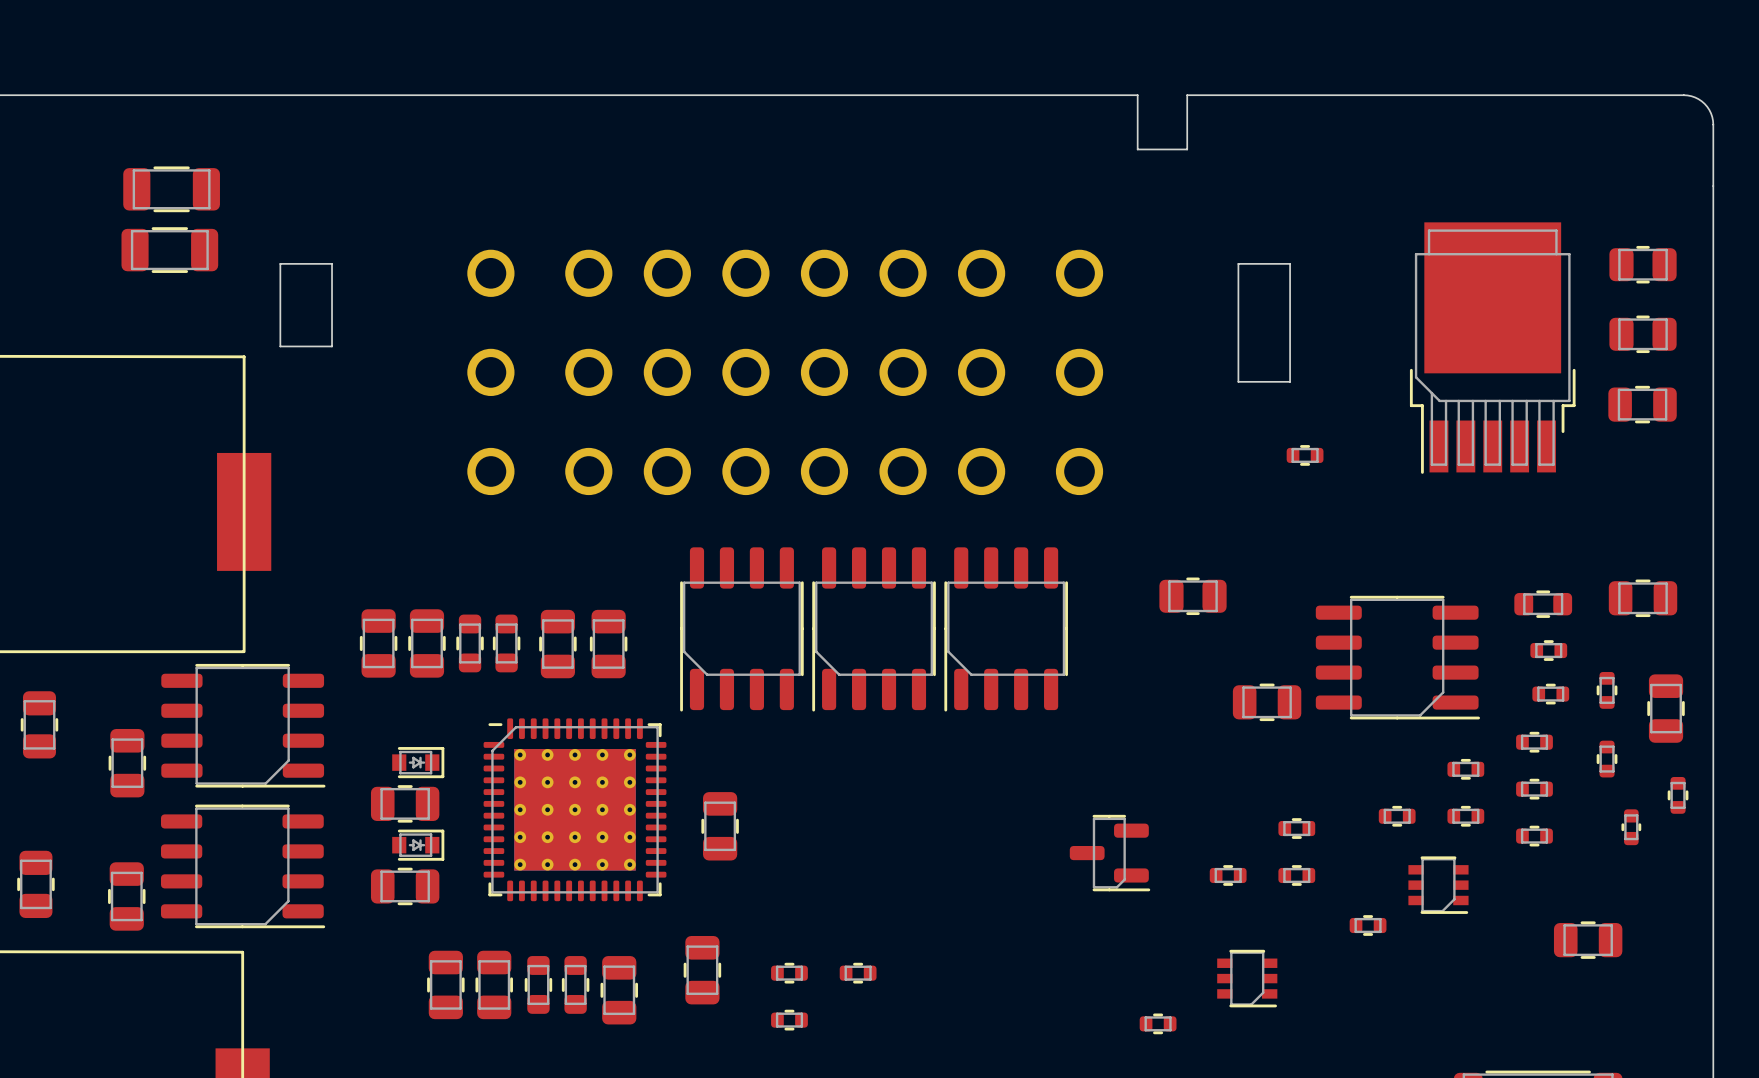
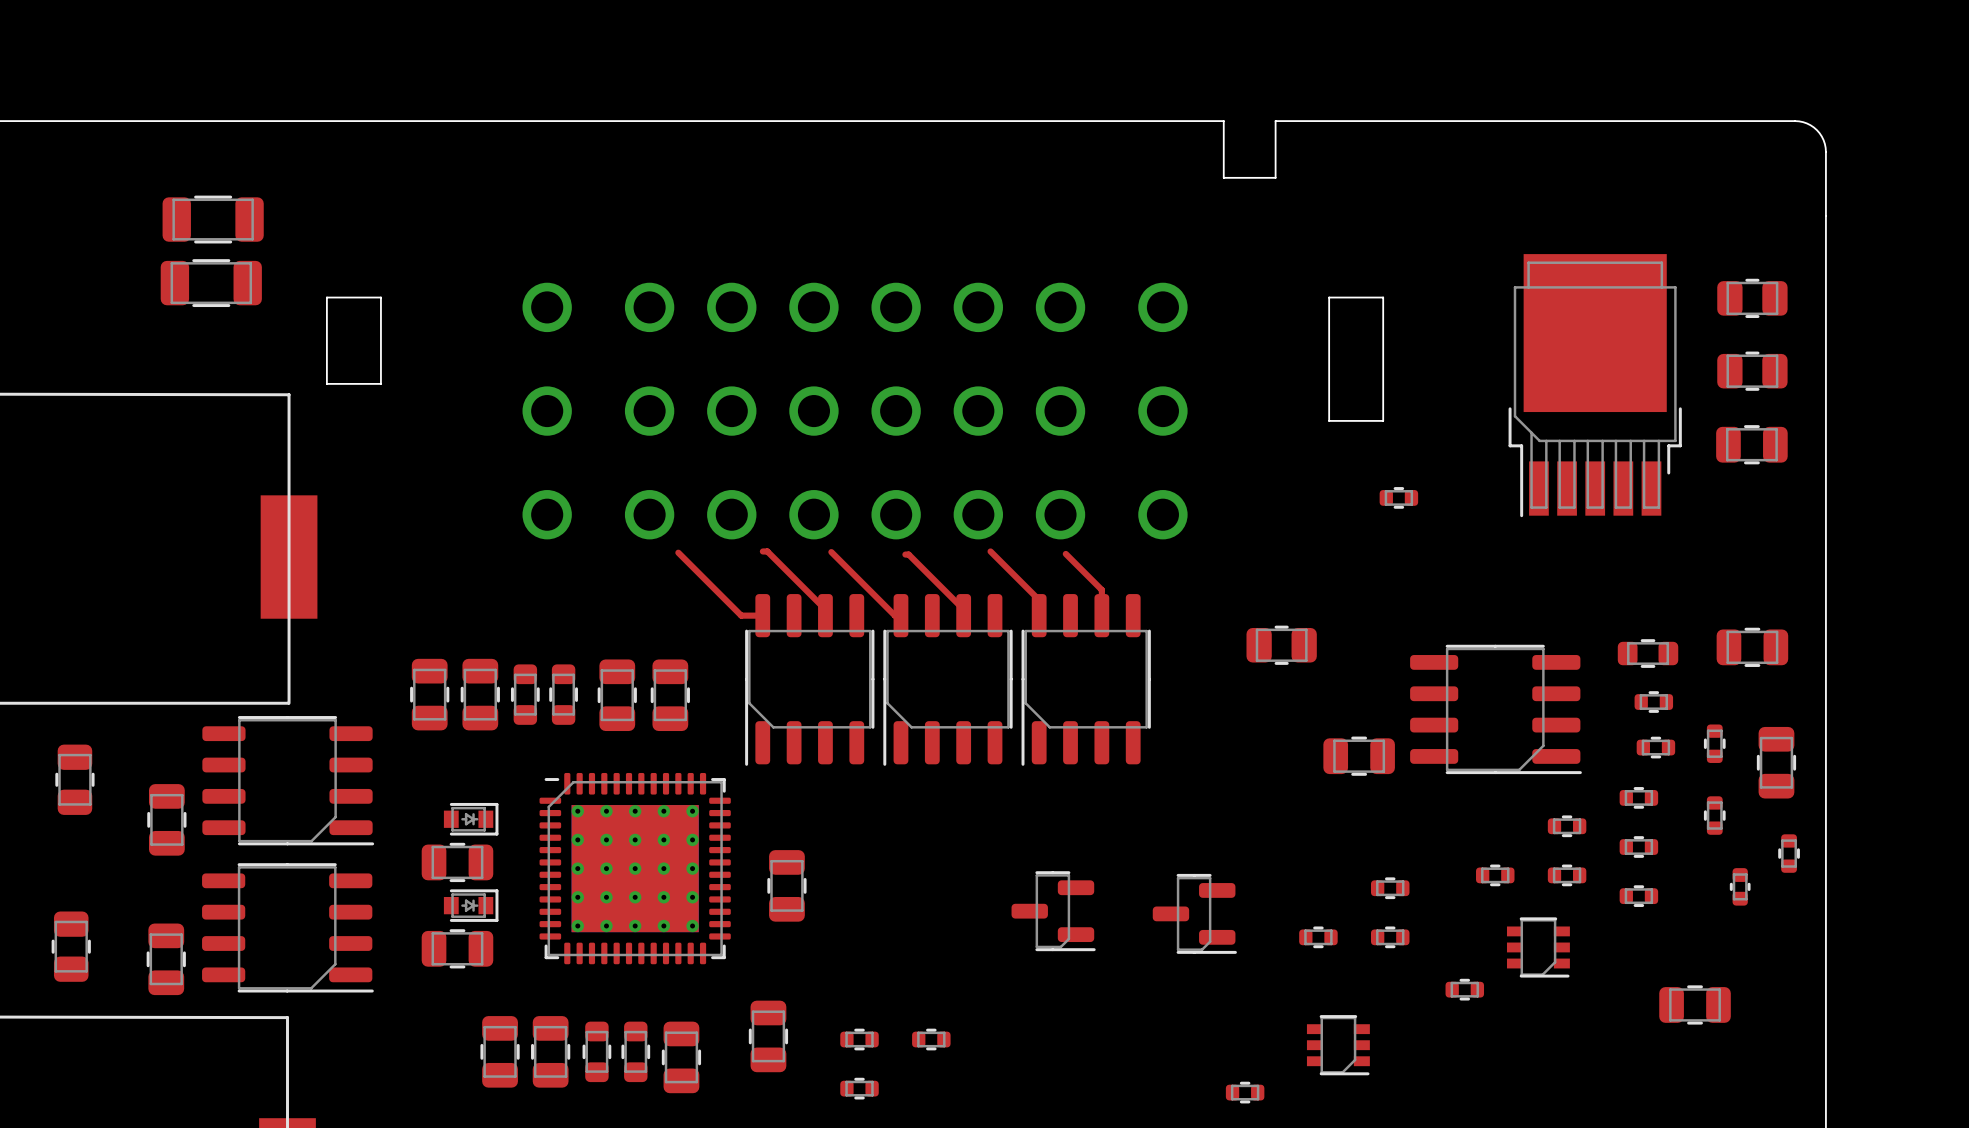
top track: none -> (762, 551) (767, 551) (825, 609) (825, 615)
top track: none -> (990, 551) (1039, 600) (1039, 615)
top track: none -> (678, 552) (741, 615) (762, 615)
top track: none -> (831, 552) (894, 615) (900, 615)
top track: none -> (1065, 553) (1101, 589) (1101, 615)
top track: none -> (905, 554) (908, 554) (963, 609) (963, 615)
part: none -> (1053, 911)

